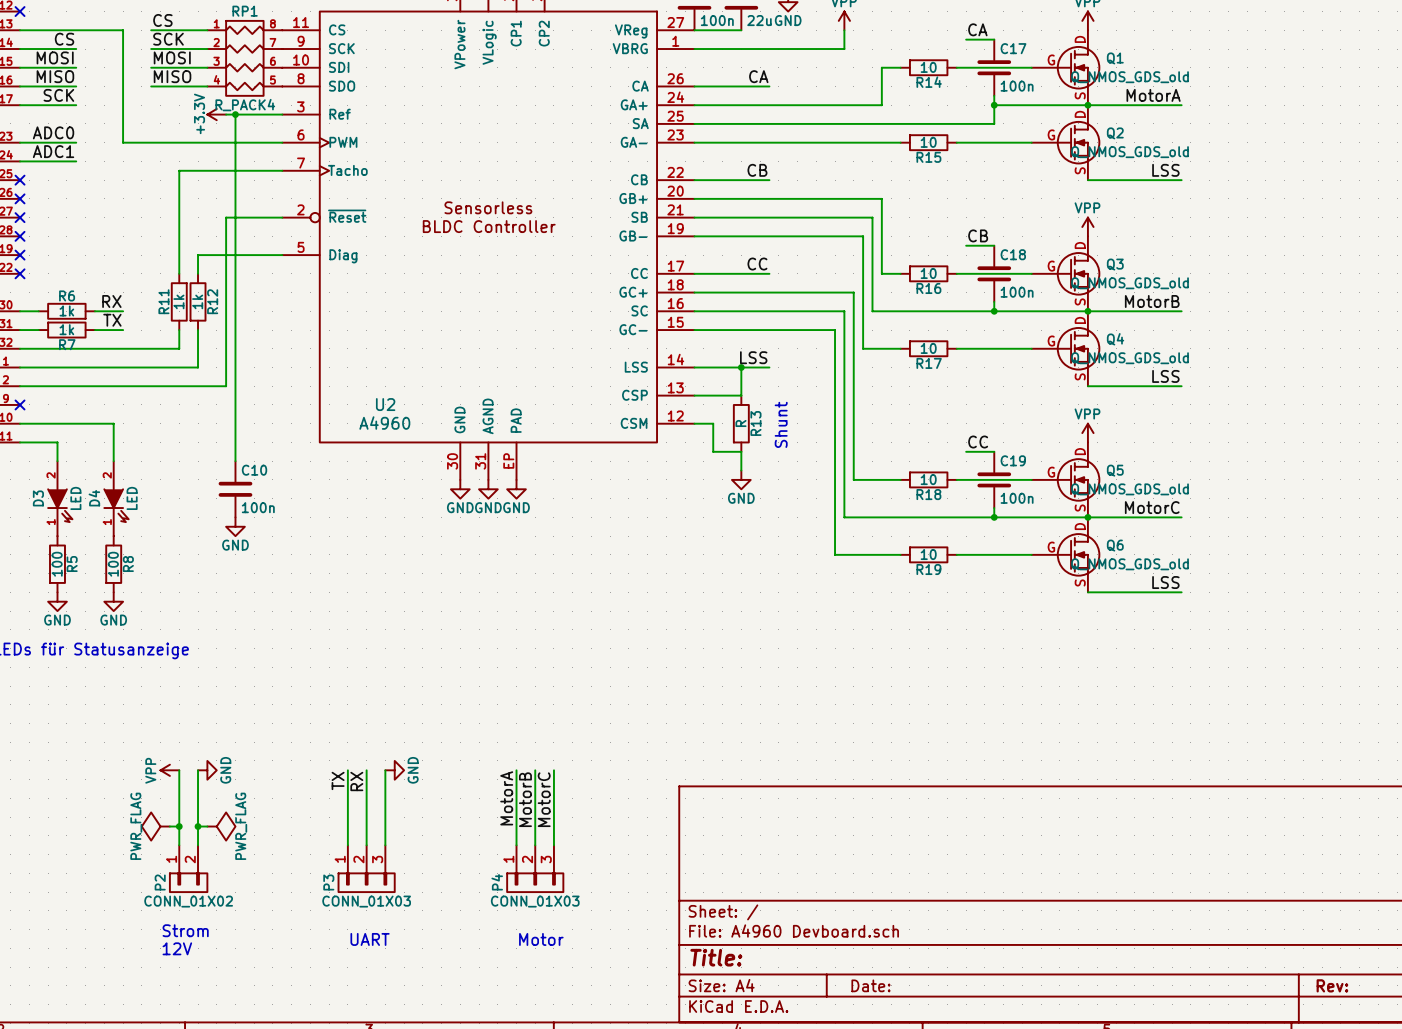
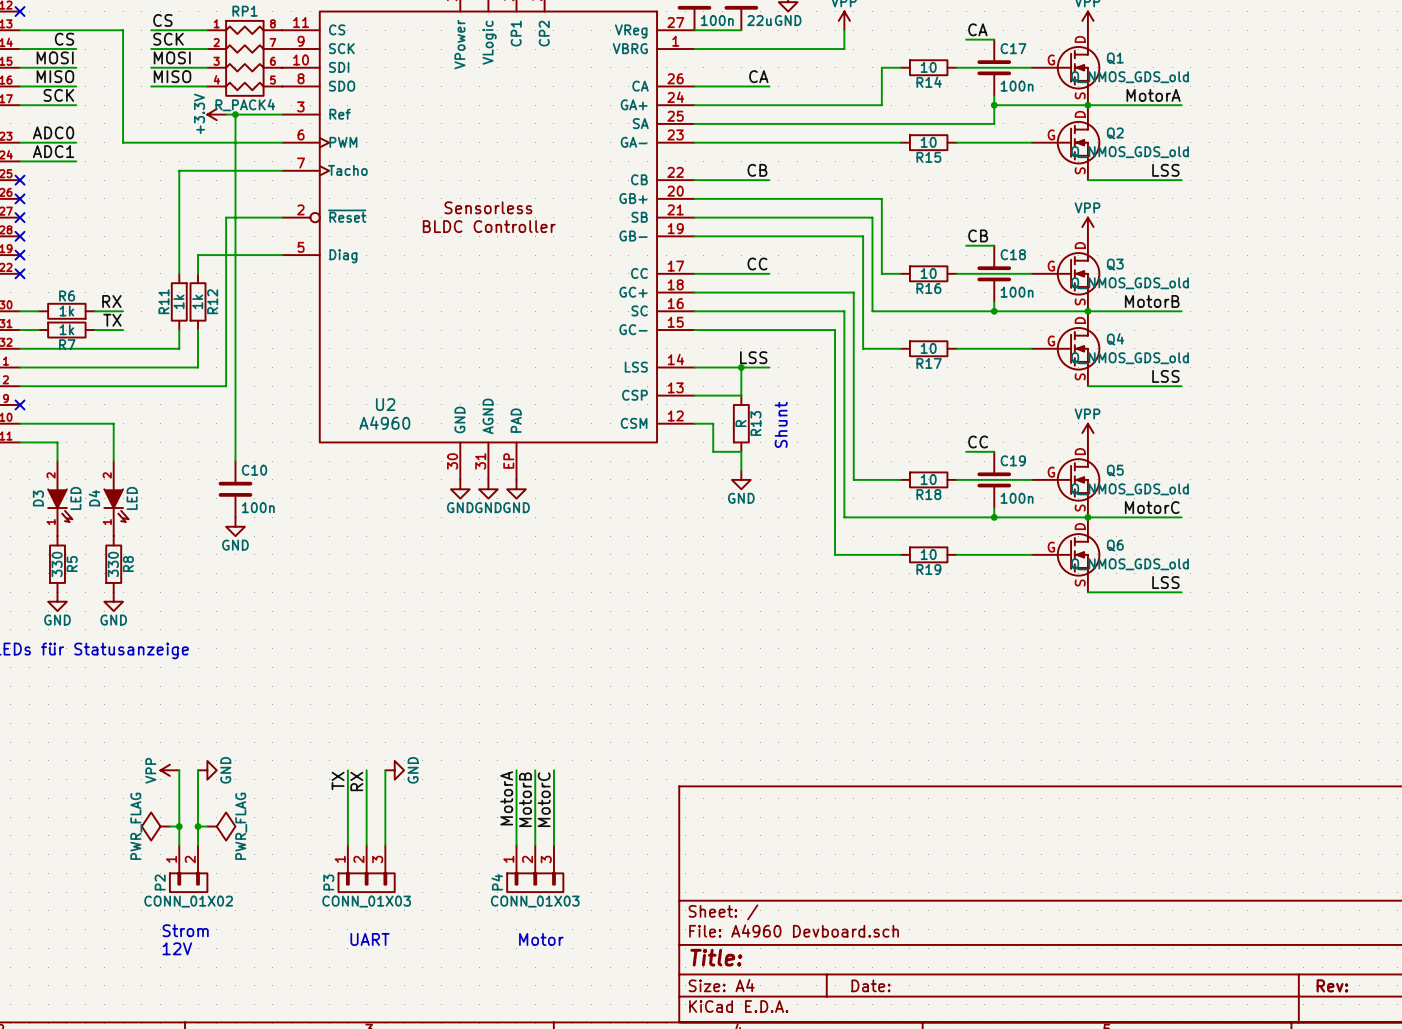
R5 value: 100 (57, 564) -> 330 (57, 564)
R8 value: 100 (113, 564) -> 330 (113, 564)

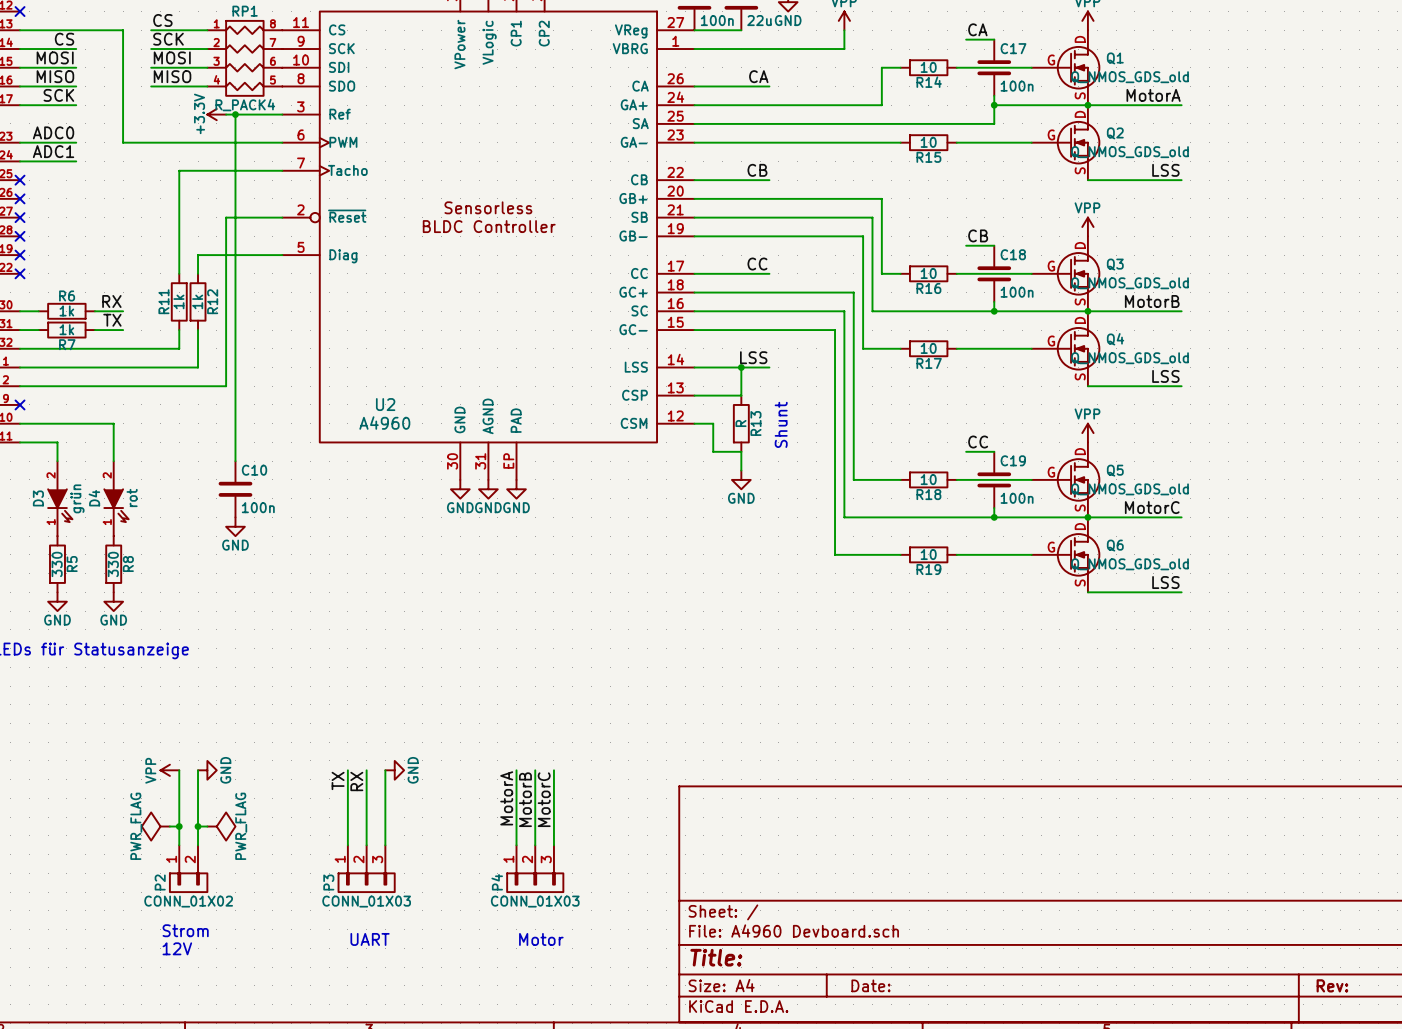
D3 value: LED (75, 498) -> grün (77, 498)
D4 value: LED (132, 498) -> rot (132, 497)

